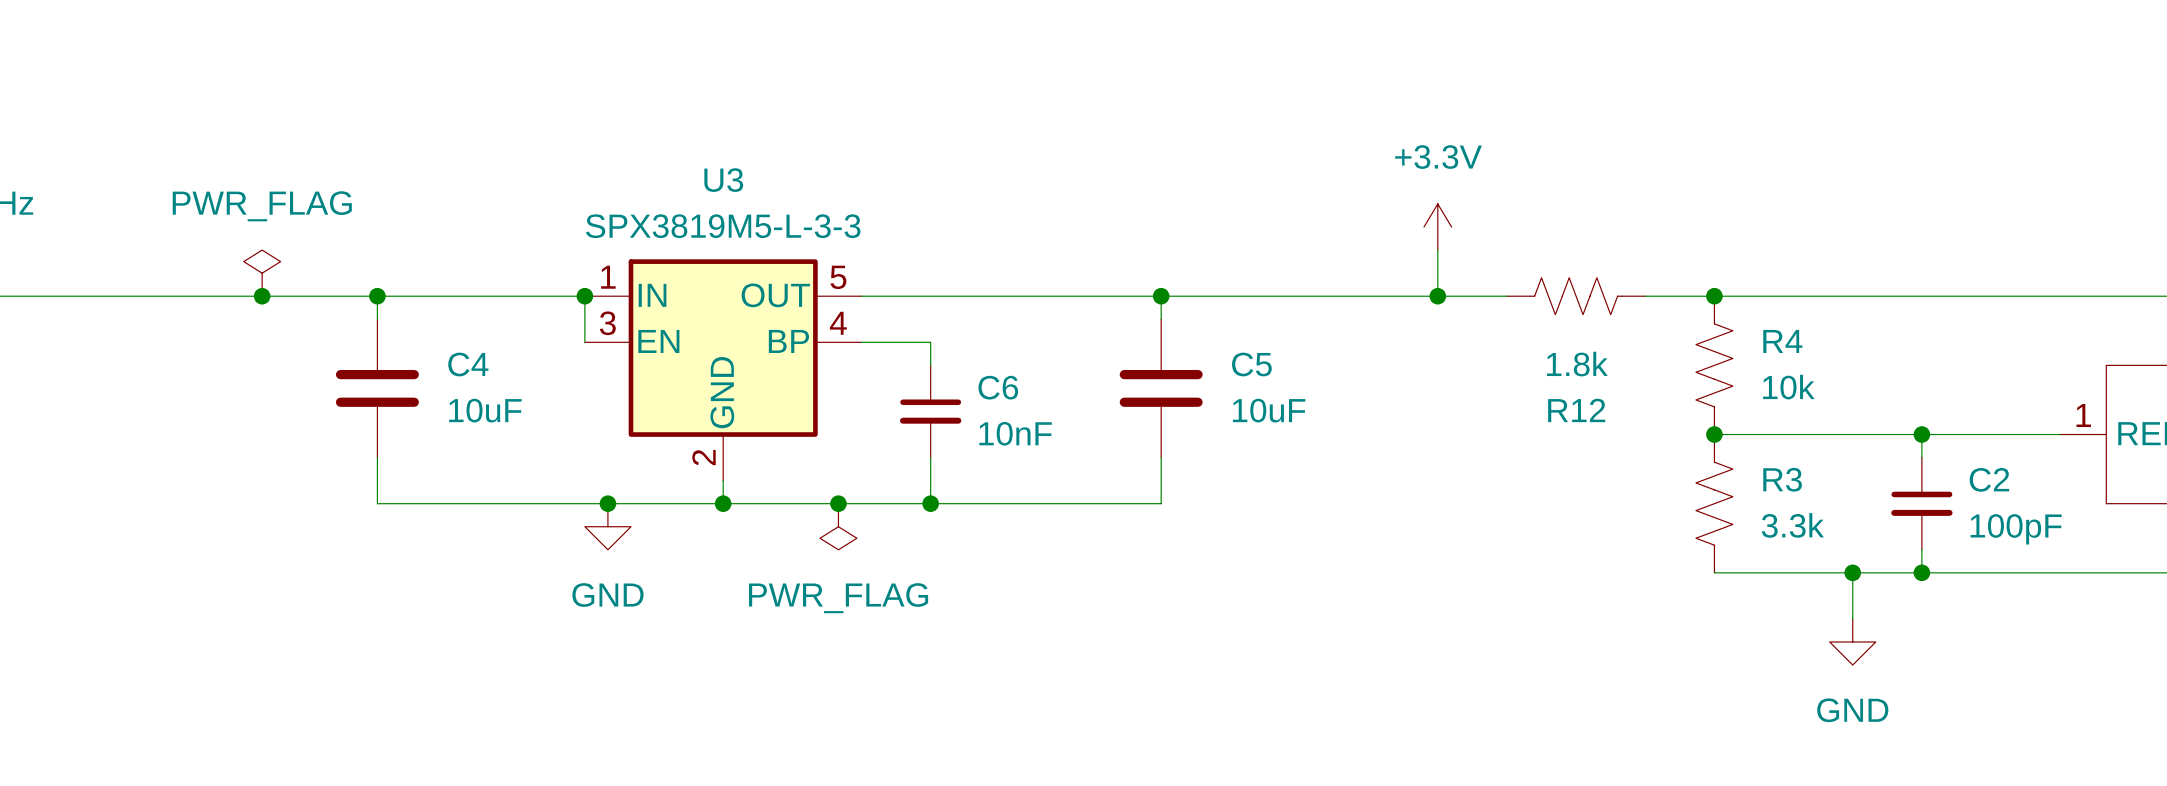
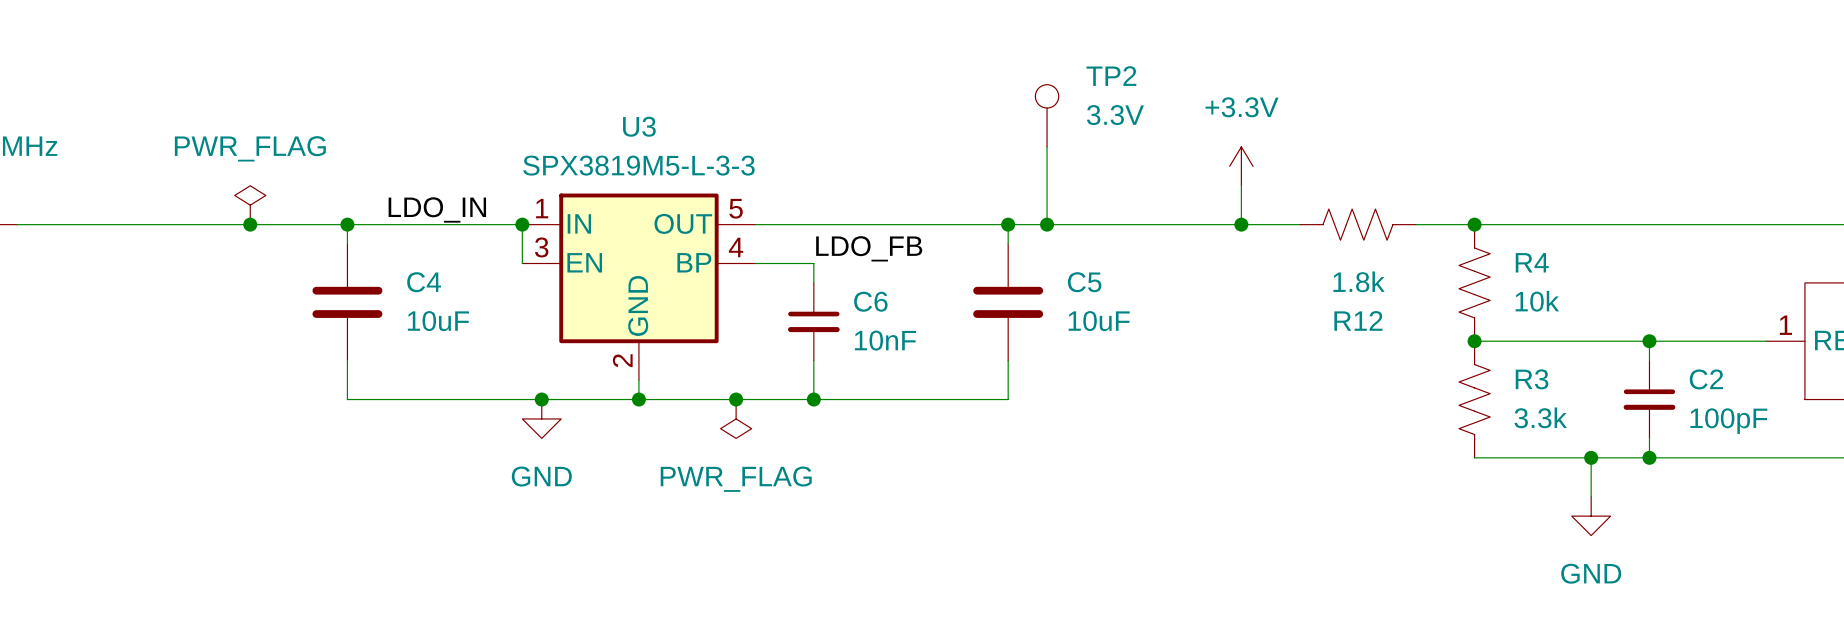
TP2: none -> 3.3V (1047, 115)
wire: none -> (1047, 146) (1047, 224)
label: none -> LDO_IN (437, 209)
junction: none -> (1047, 224)
label: none -> LDO_FB (869, 248)

